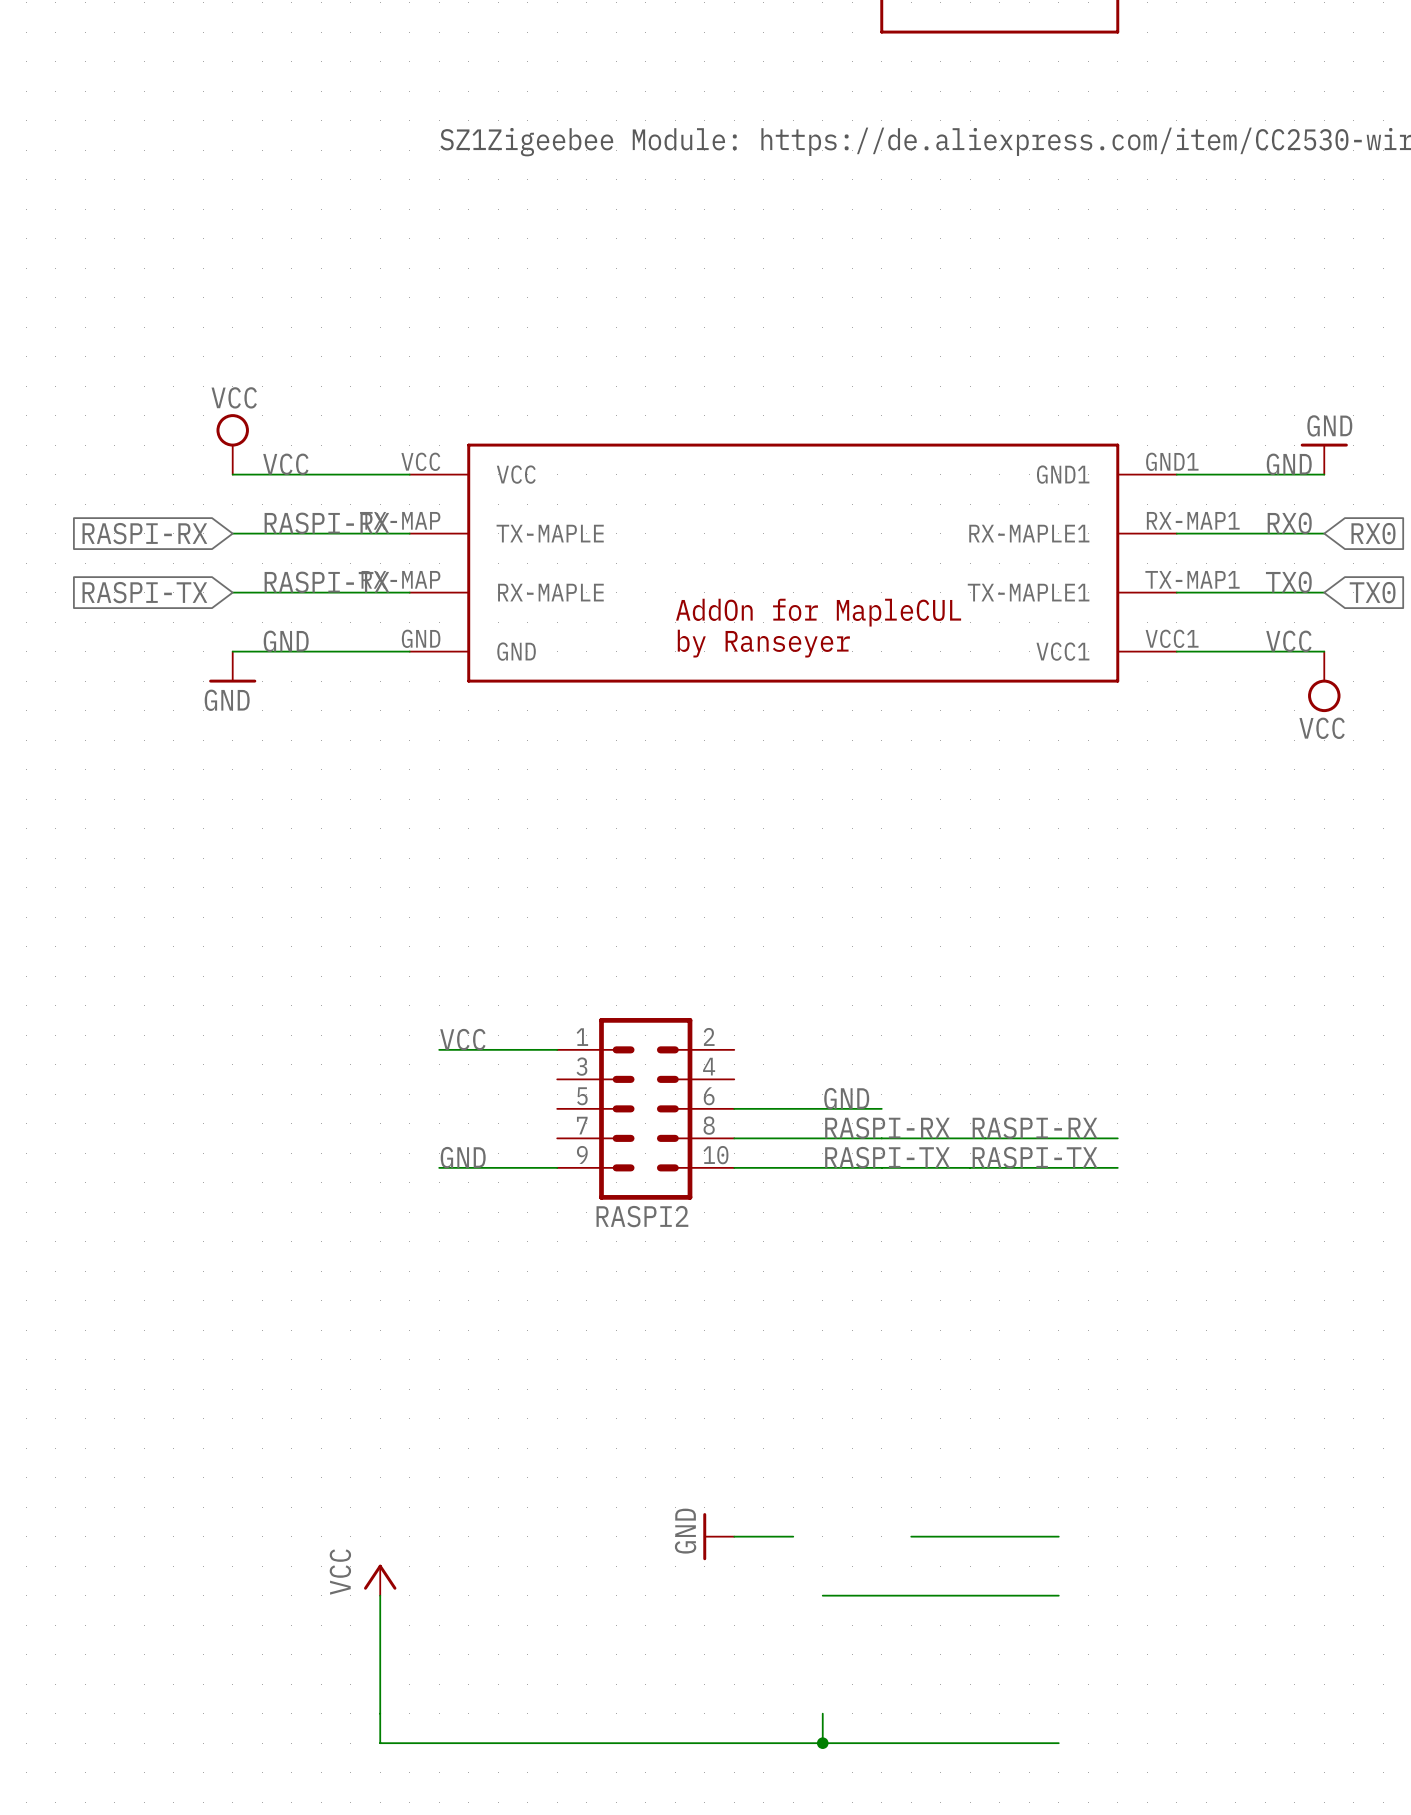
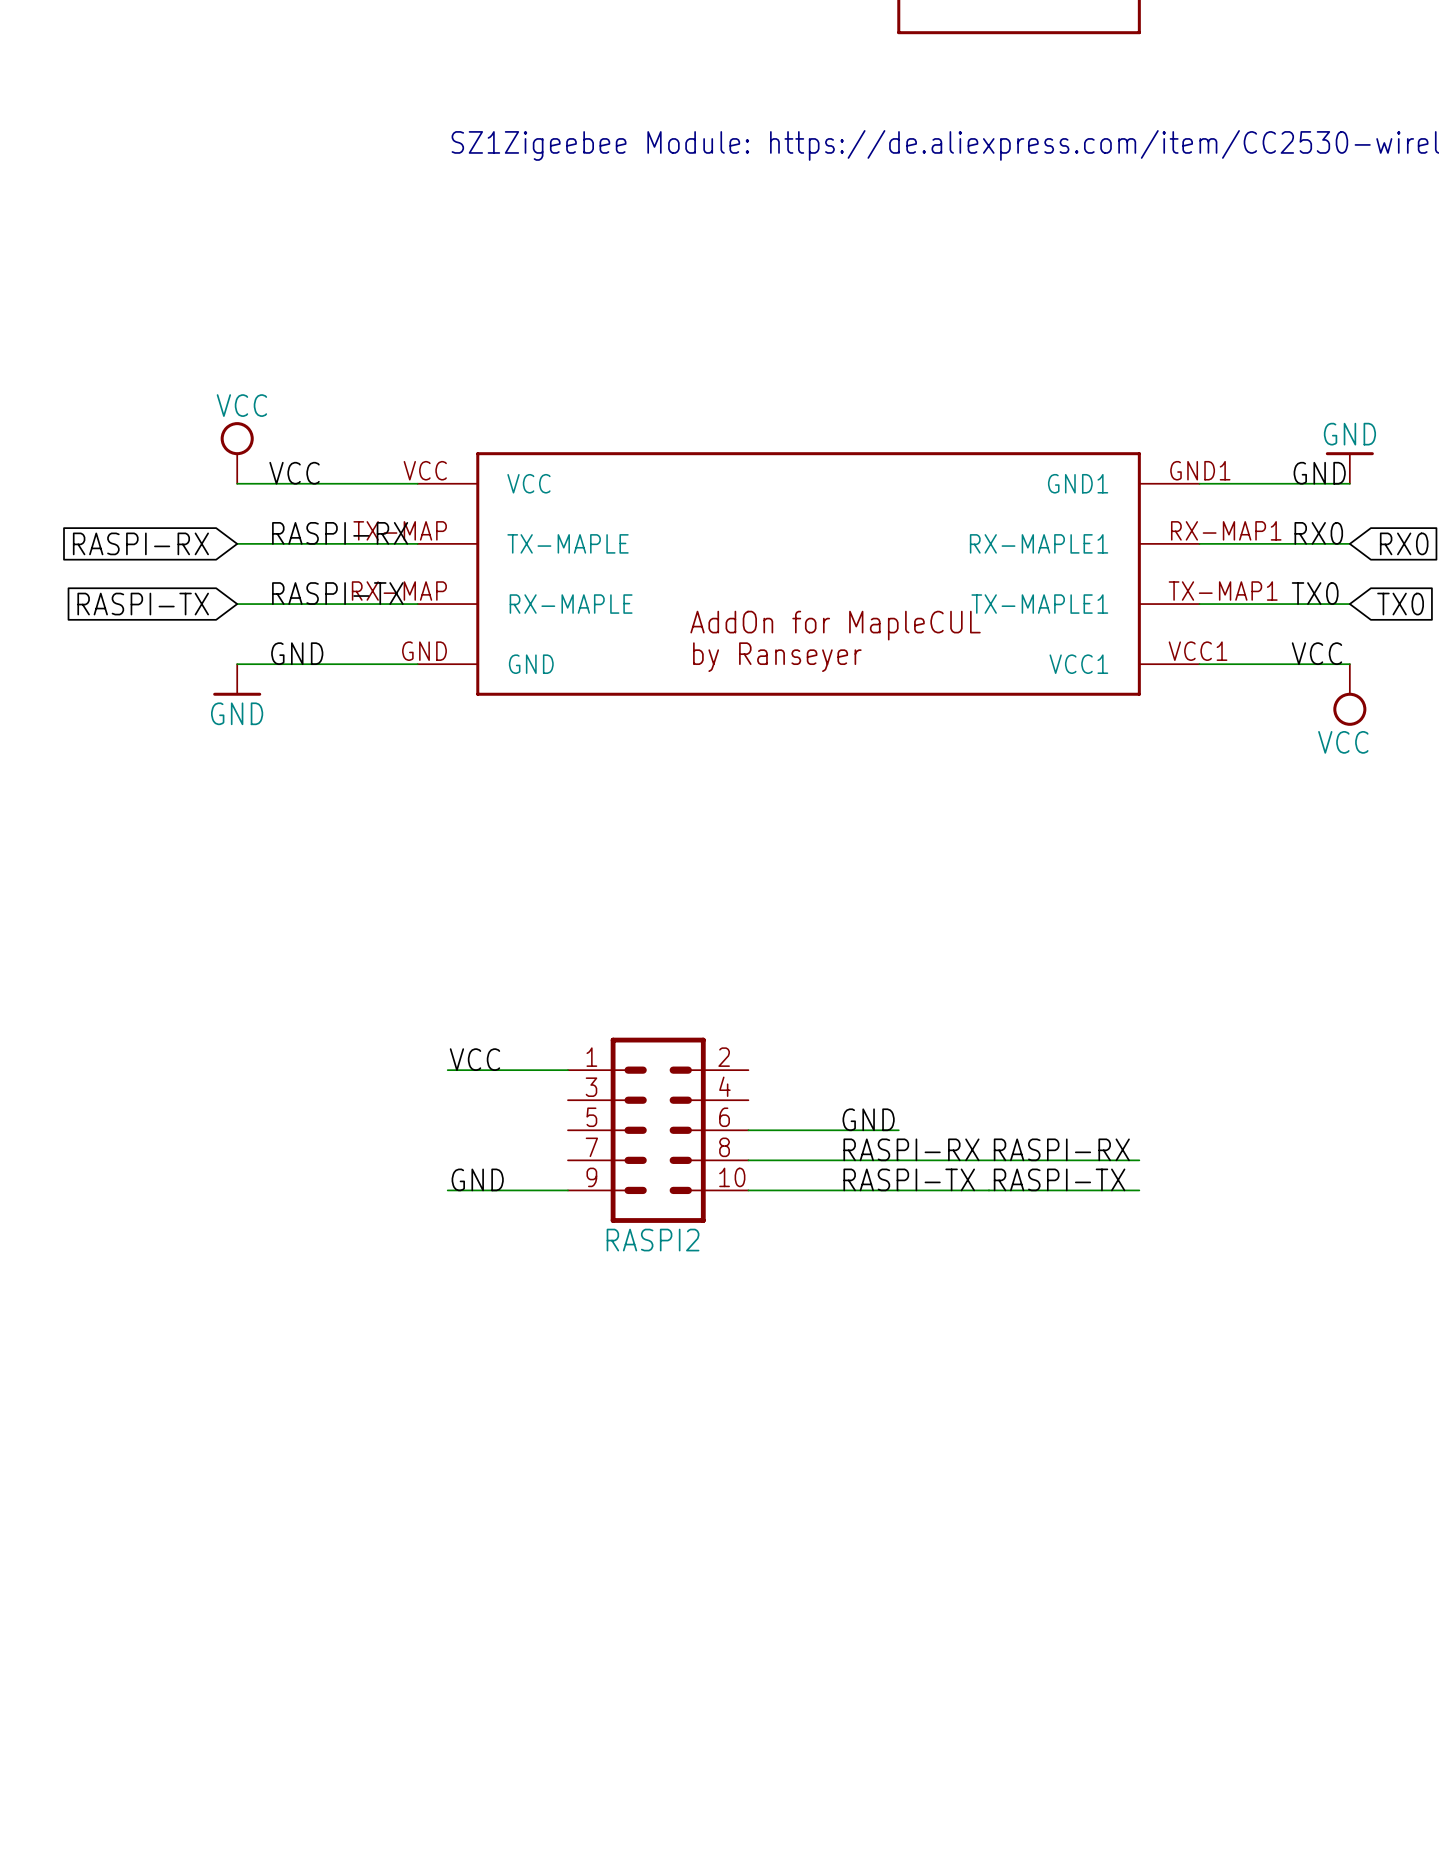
power symbol: GND (718, 1536) -> none
wire: (734, 1536) (793, 1536) -> none
wire: (911, 1536) (1058, 1536) -> none
power symbol: VCC (380, 1580) -> none
wire: (380, 1595) (380, 1743) (1058, 1743) -> none
wire: (822, 1595) (1058, 1595) -> none
wire: (822, 1713) (822, 1743) -> none
junction: (822, 1743) -> none

